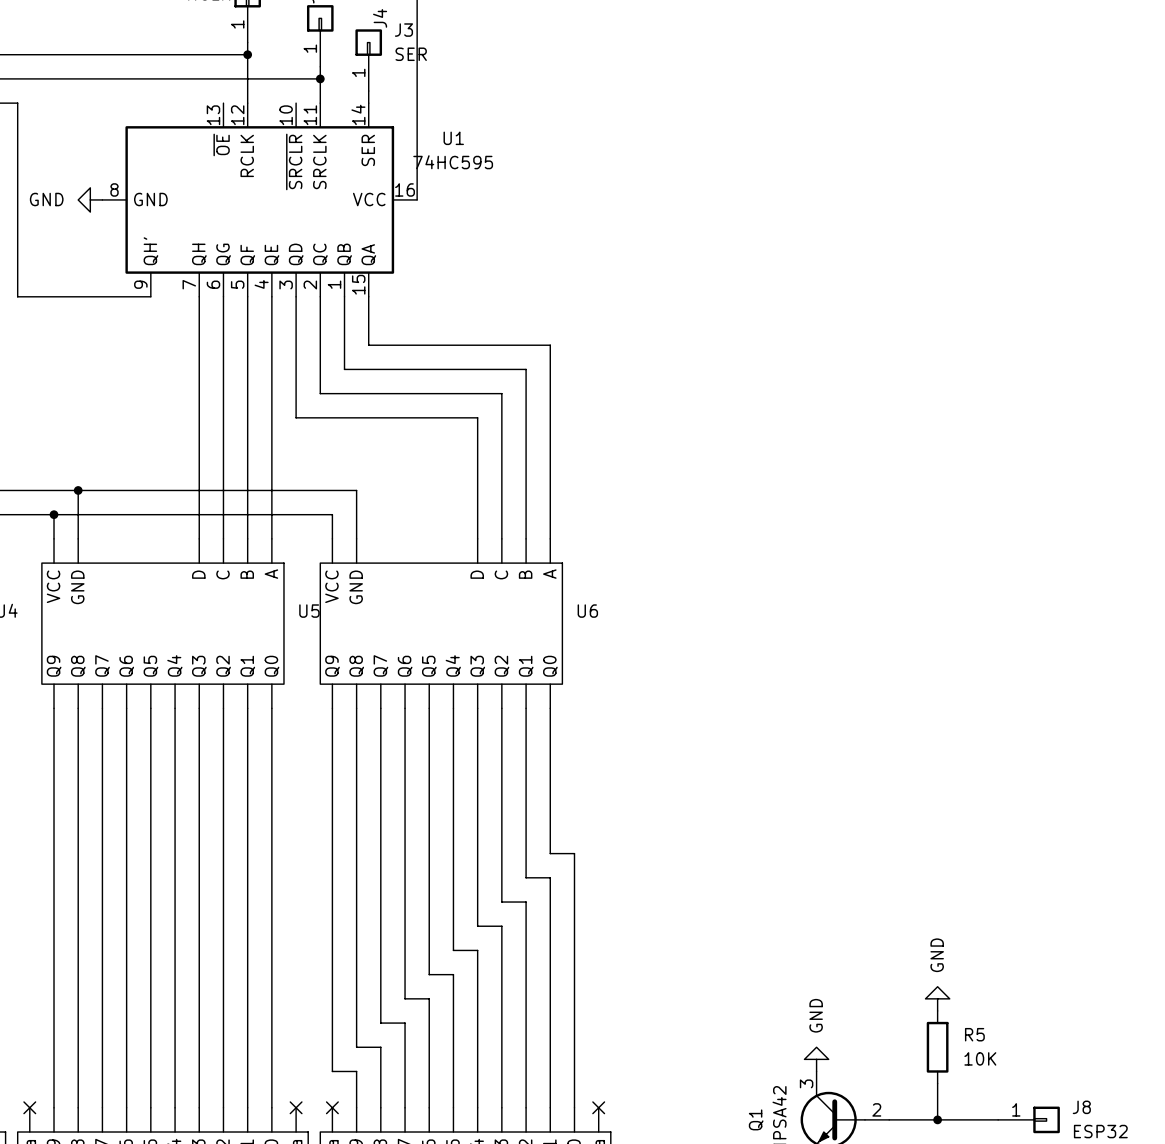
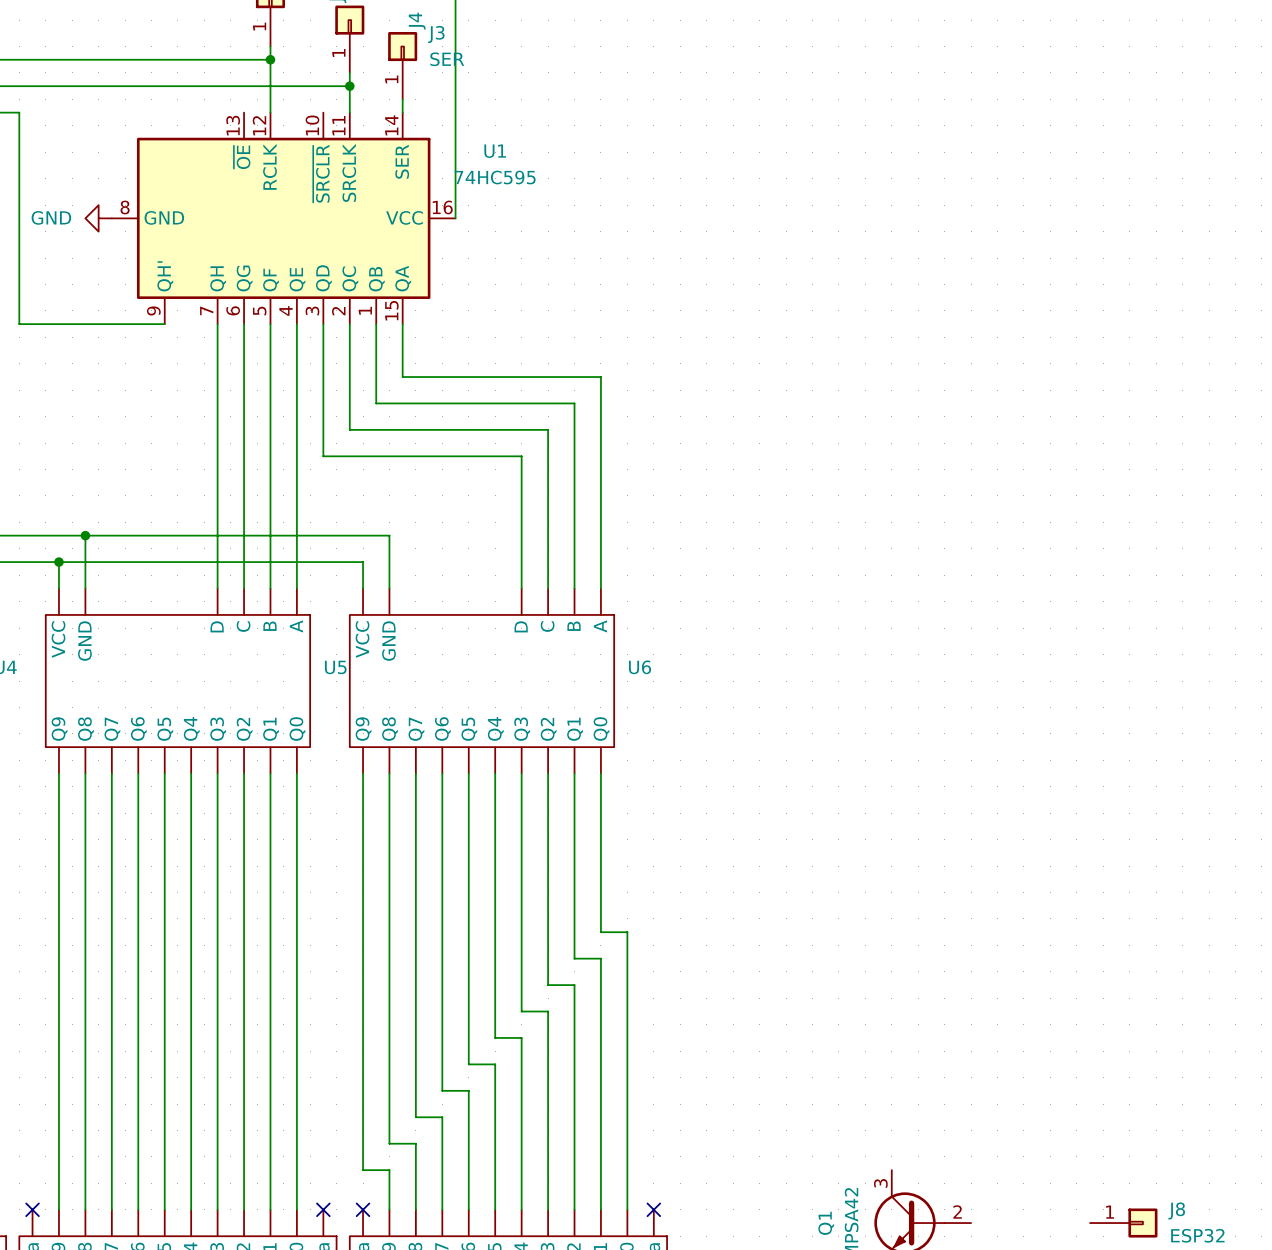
power symbol: GND (937, 998) -> none
R5: 10K (937, 1047) -> none
power symbol: GND (816, 1059) -> none
wire: (937, 1083) (937, 1119) -> none
wire: (889, 1119) (998, 1119) -> none
junction: (937, 1119) -> none

